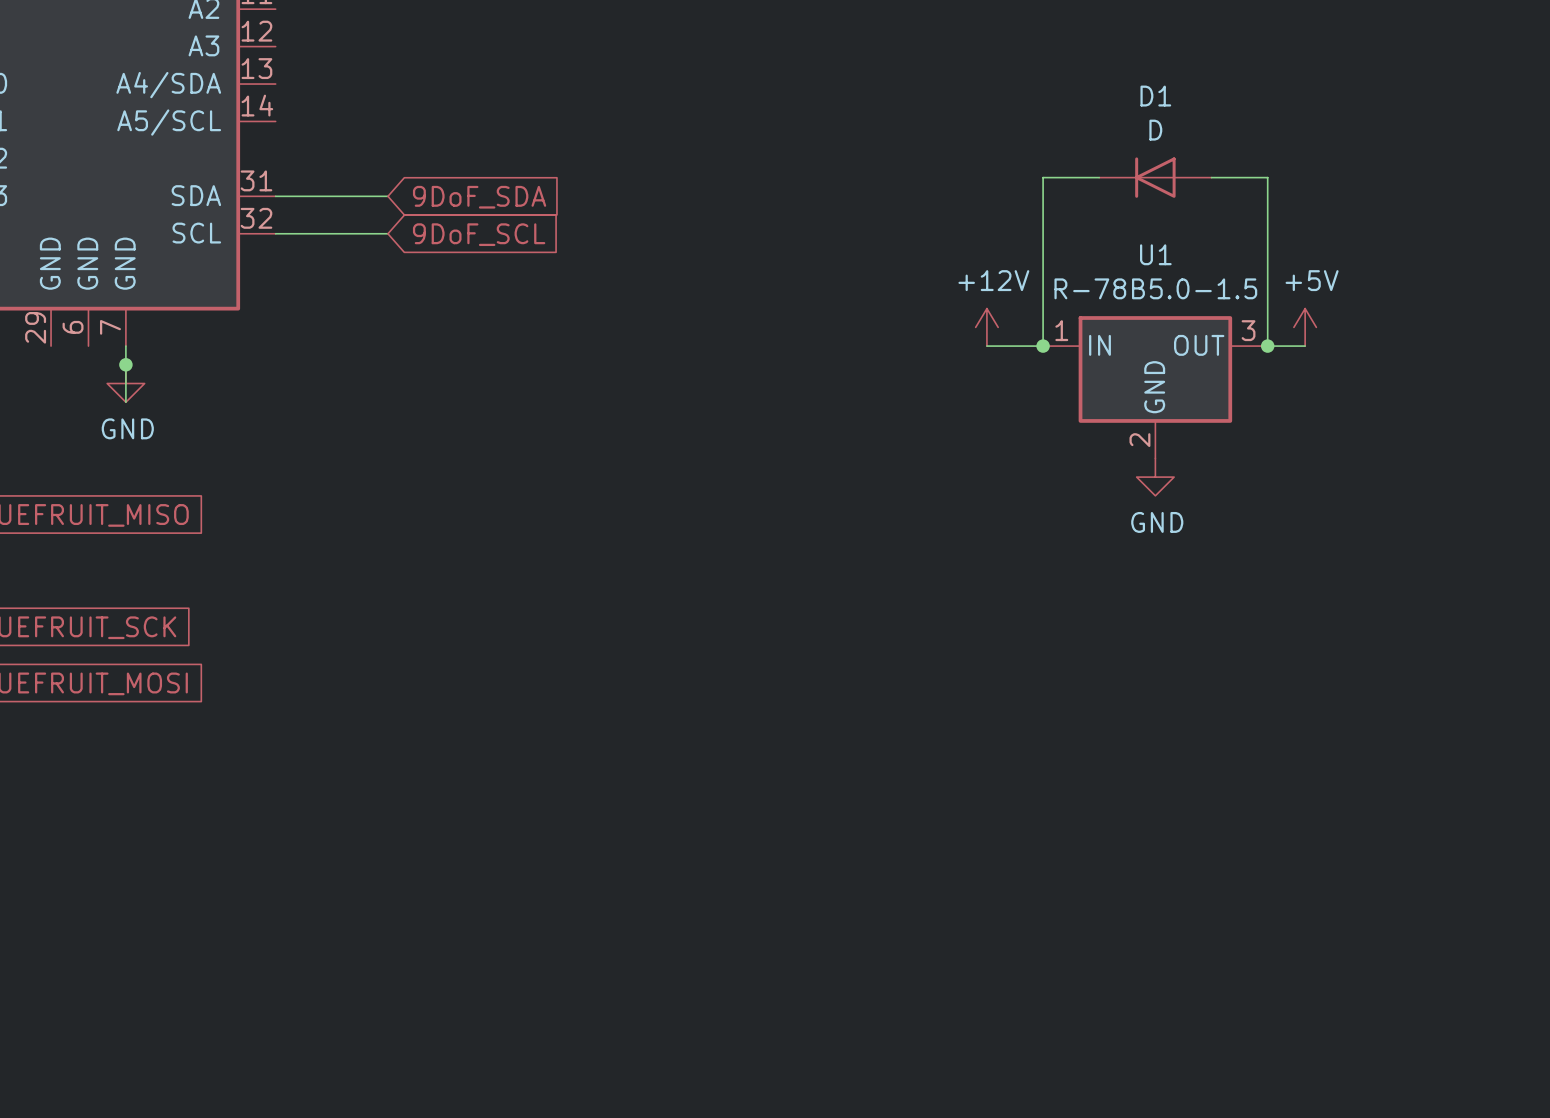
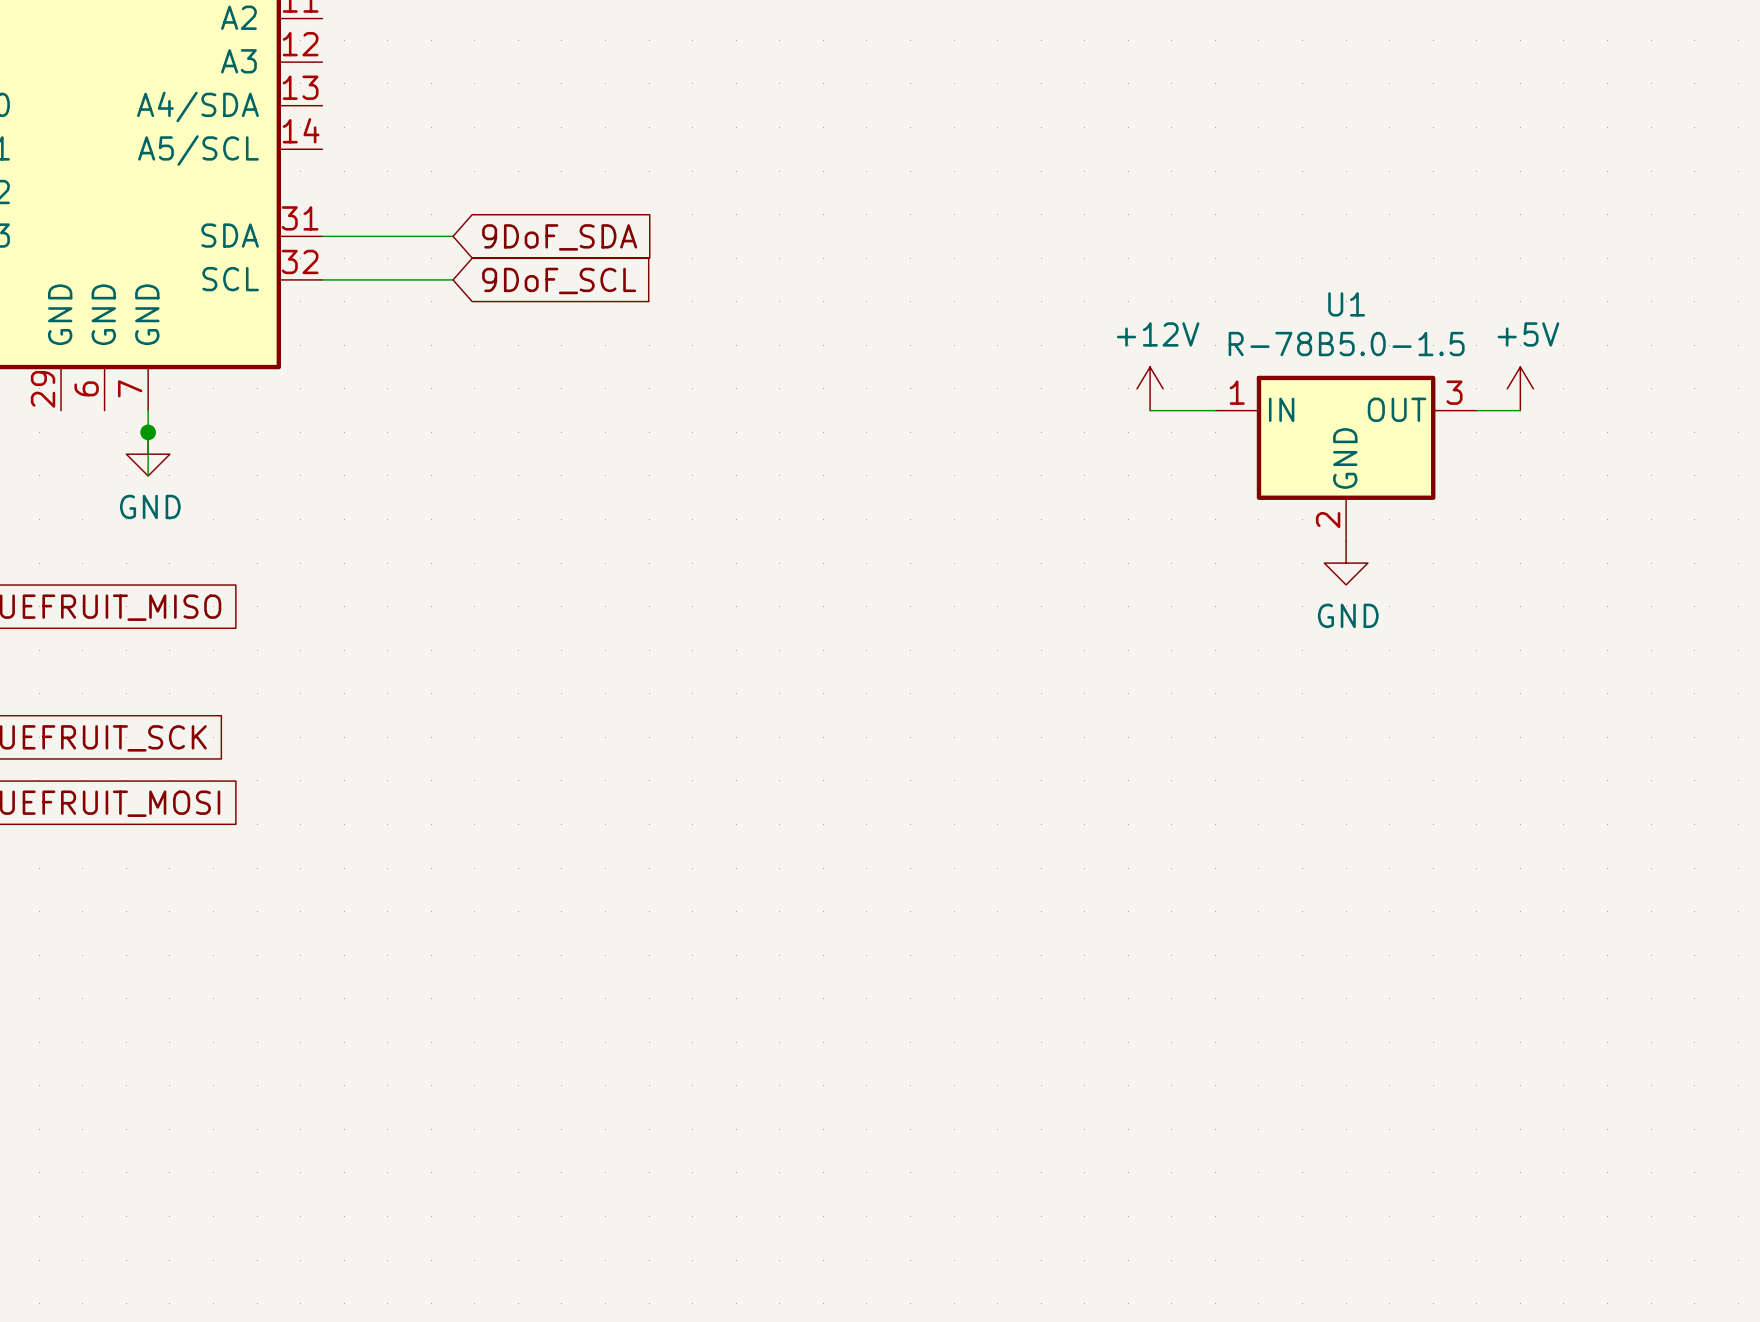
wire: (1099, 177) (1043, 177) (1043, 346) -> none
D1: D (1155, 177) -> none
wire: (1211, 177) (1267, 177) (1267, 346) -> none
junction: (1043, 346) -> none
junction: (1267, 346) -> none

